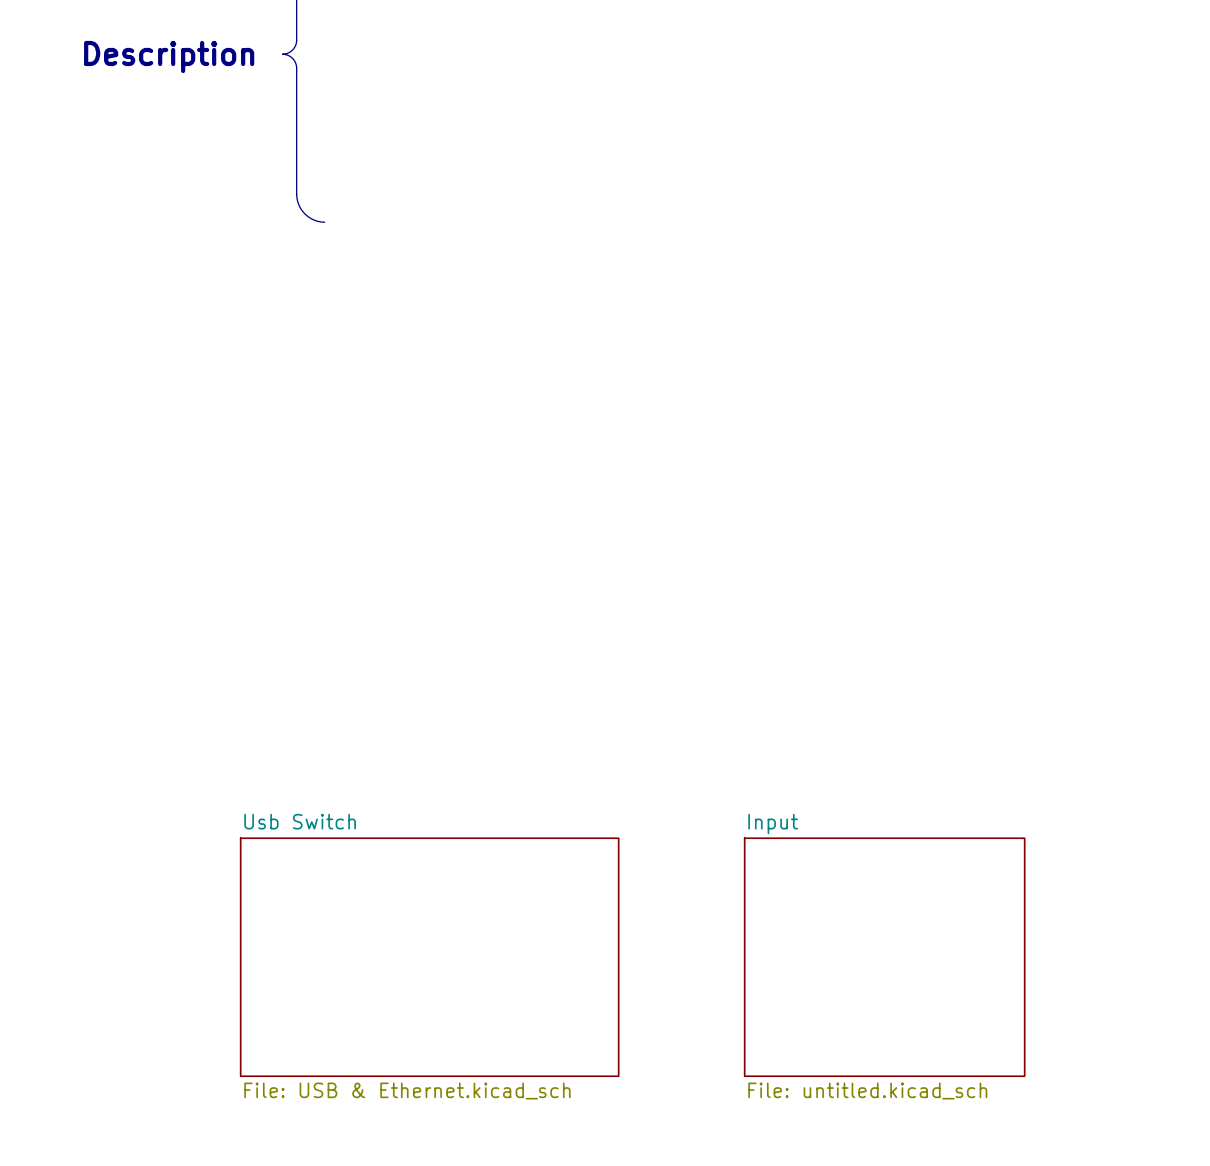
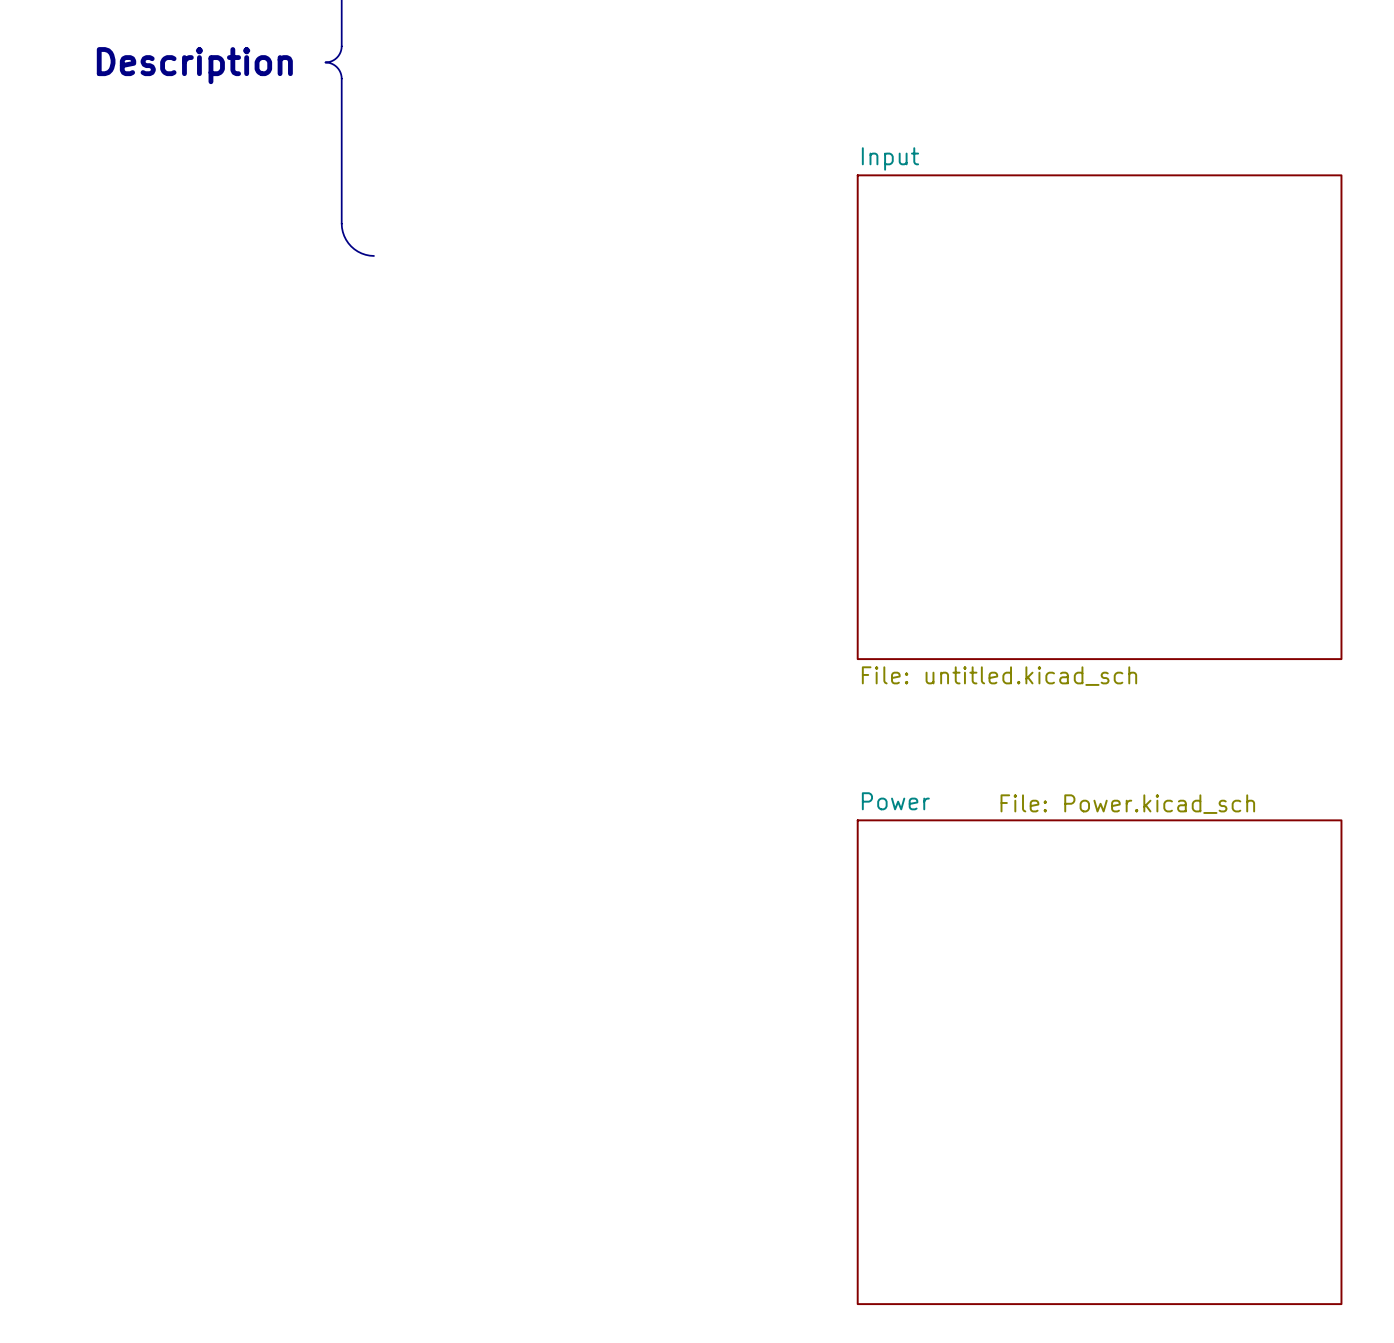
sheet Input: none -> File: untitled.kicad_sch (1099, 417)
sheet Power: none -> File: Power.kicad_sch (1099, 1062)
sheet Usb Switch: File: USB & Ethernet.kicad_sch (429, 957) -> none
sheet Input: File: untitled.kicad_sch (884, 957) -> none

